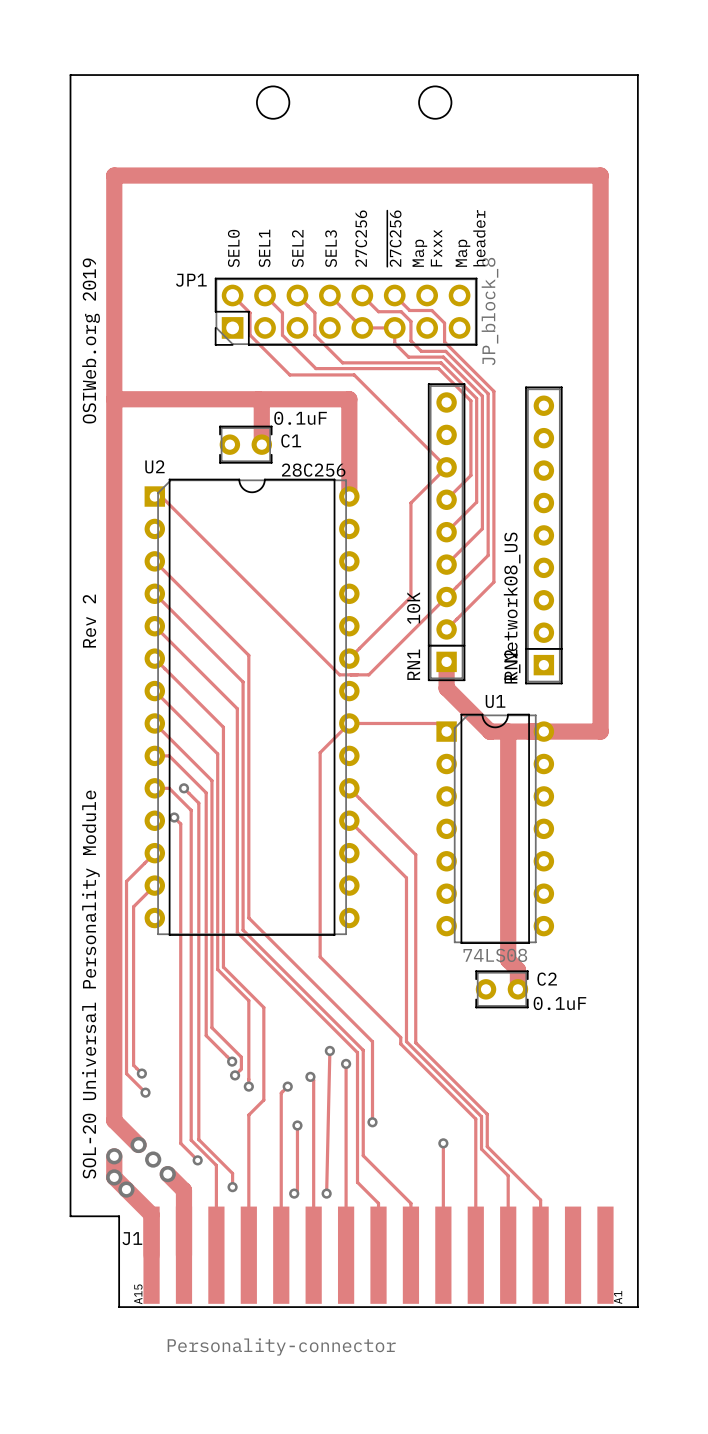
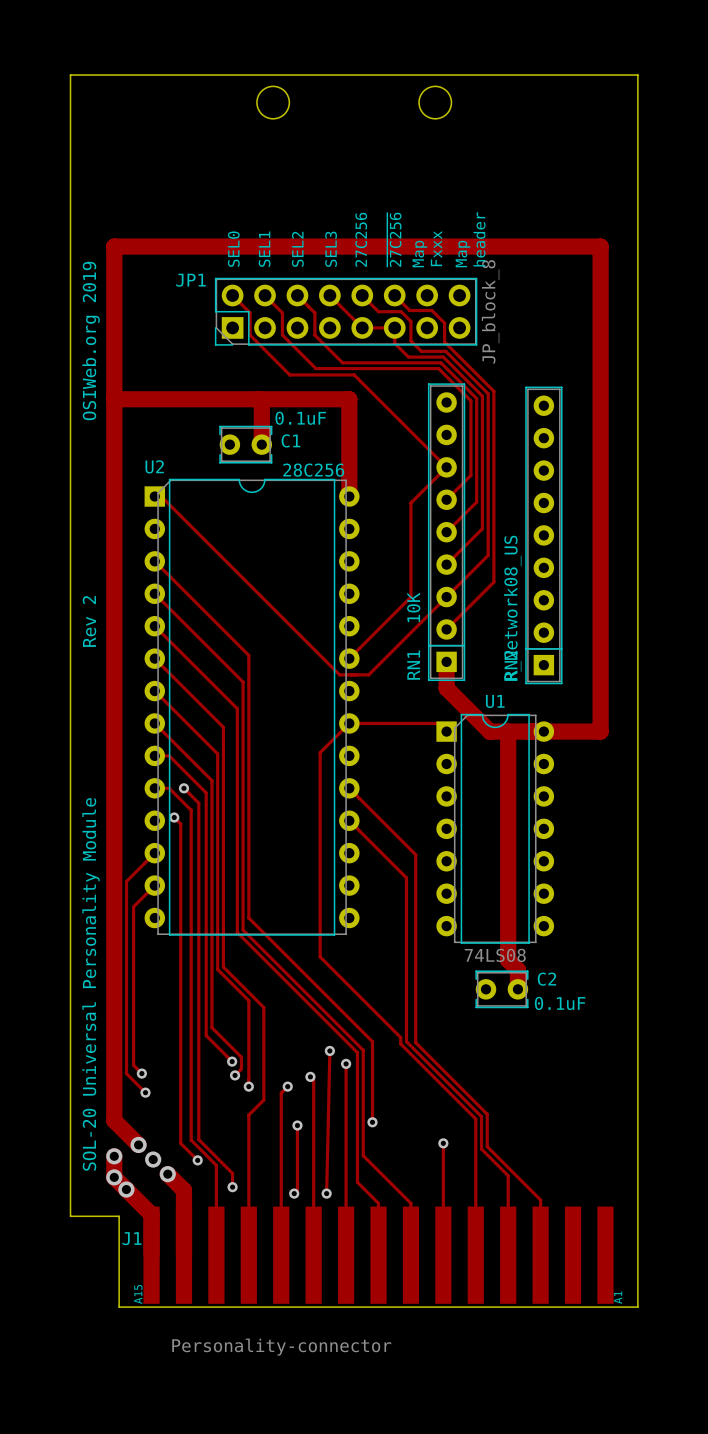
track: (114, 246) (114, 175) (600, 175) (600, 246) -> (114, 246) (600, 246)

